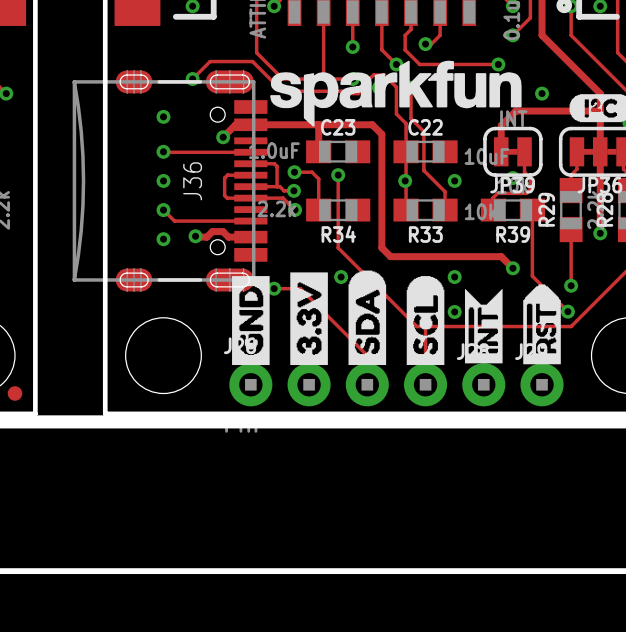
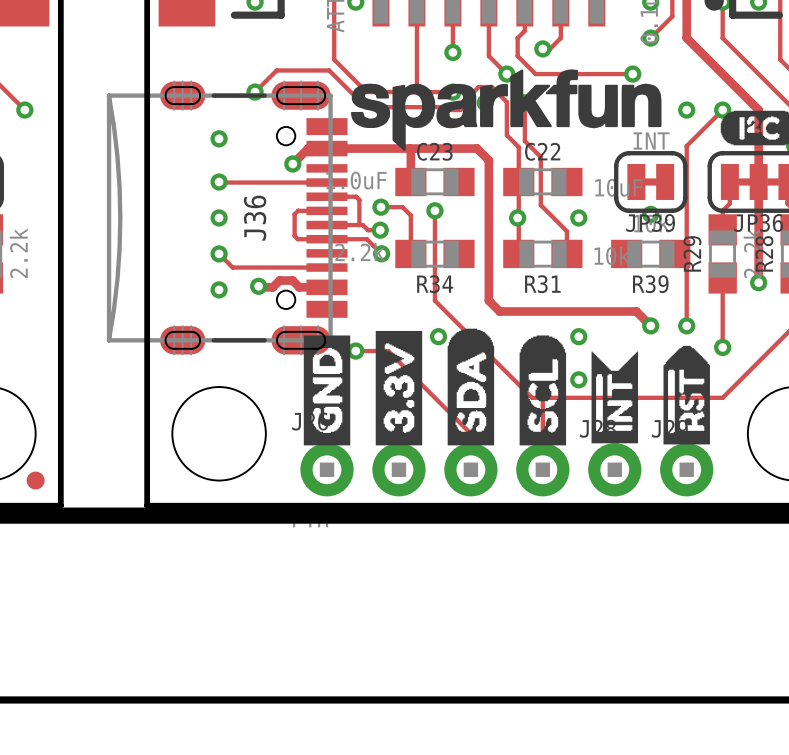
track: none -> (722, 110) (686, 146) (686, 325)
via: none -> (722, 110)
track: (600, 111) (515, 111) (501, 125) (501, 151) -> none
track: (524, 151) (524, 172) (530, 178) (530, 189) (526, 193) (497, 193) (492, 198) (493, 210) -> none
track: (532, 210) (532, 276) (567, 311) -> none
R33 name: R33 (425, 234) -> R31 (542, 284)
via position: (567, 311) -> (686, 325)

